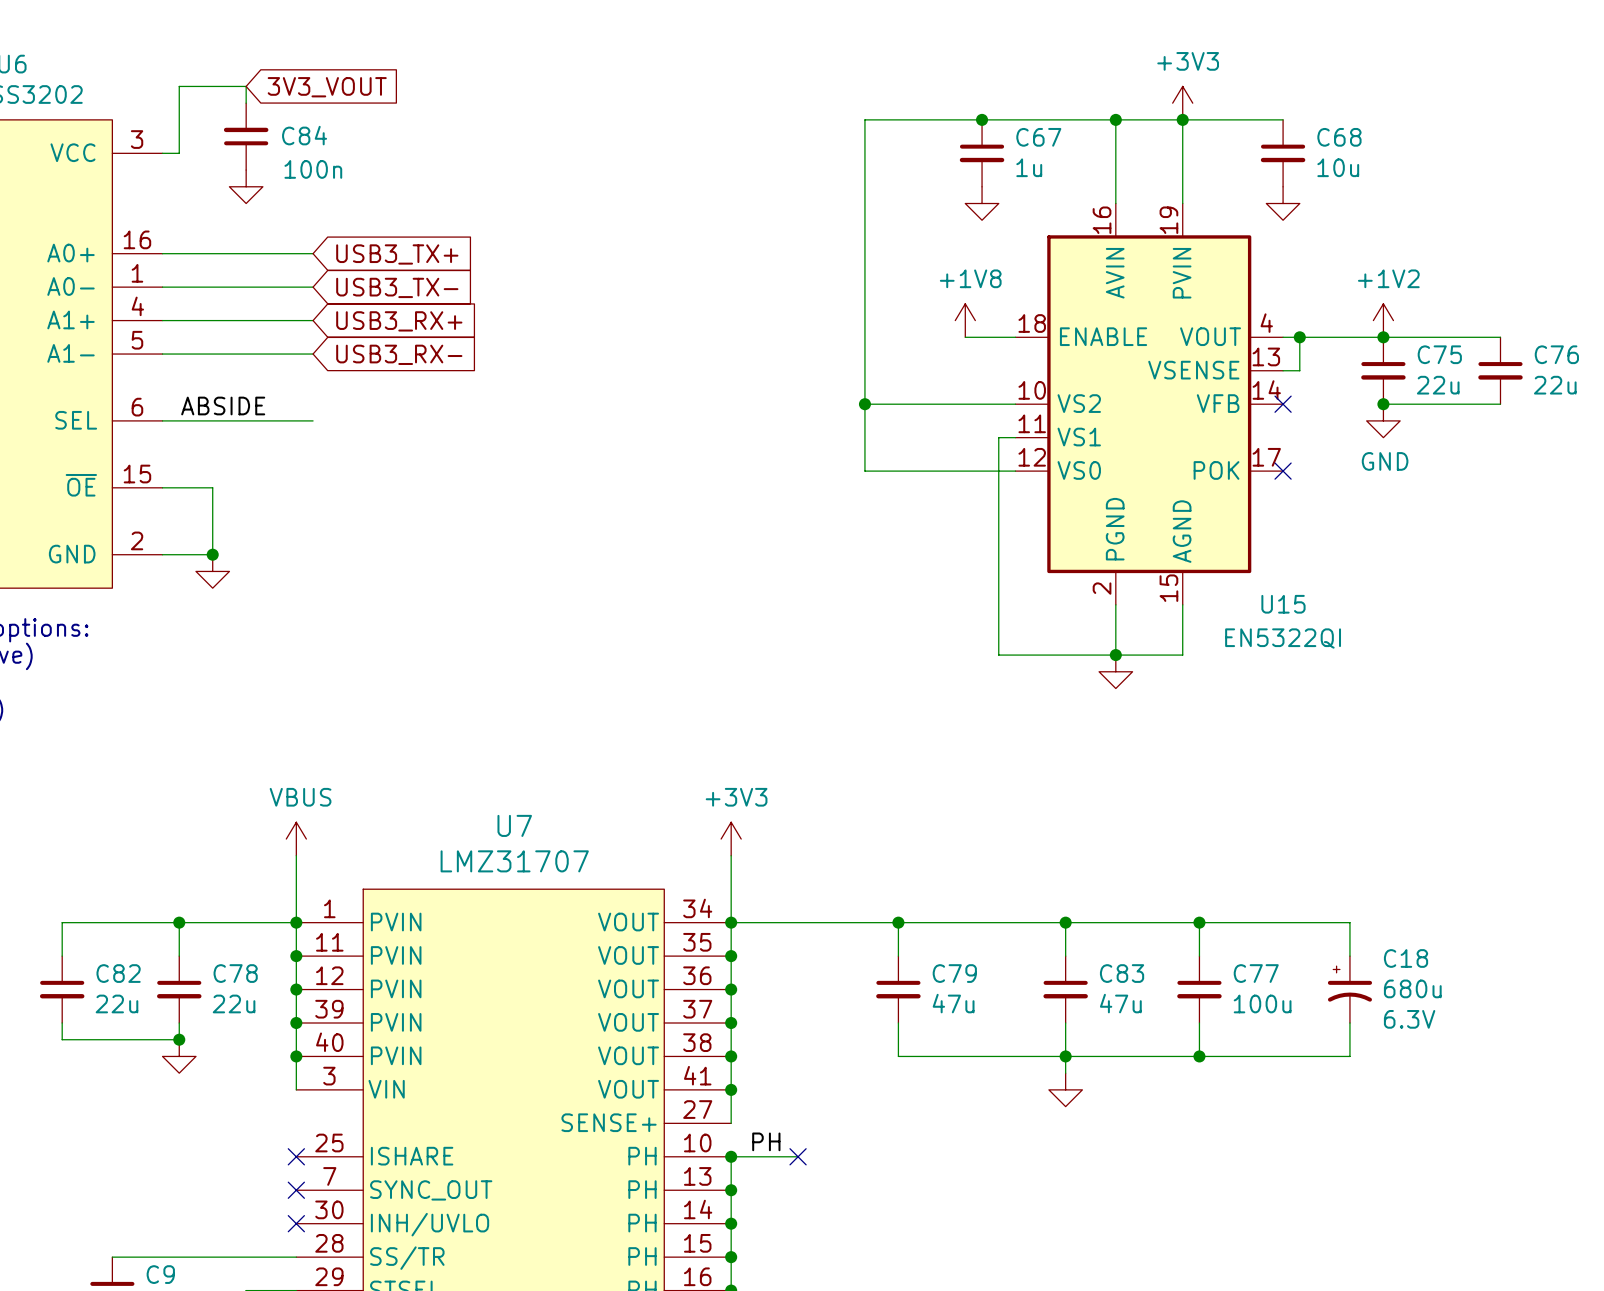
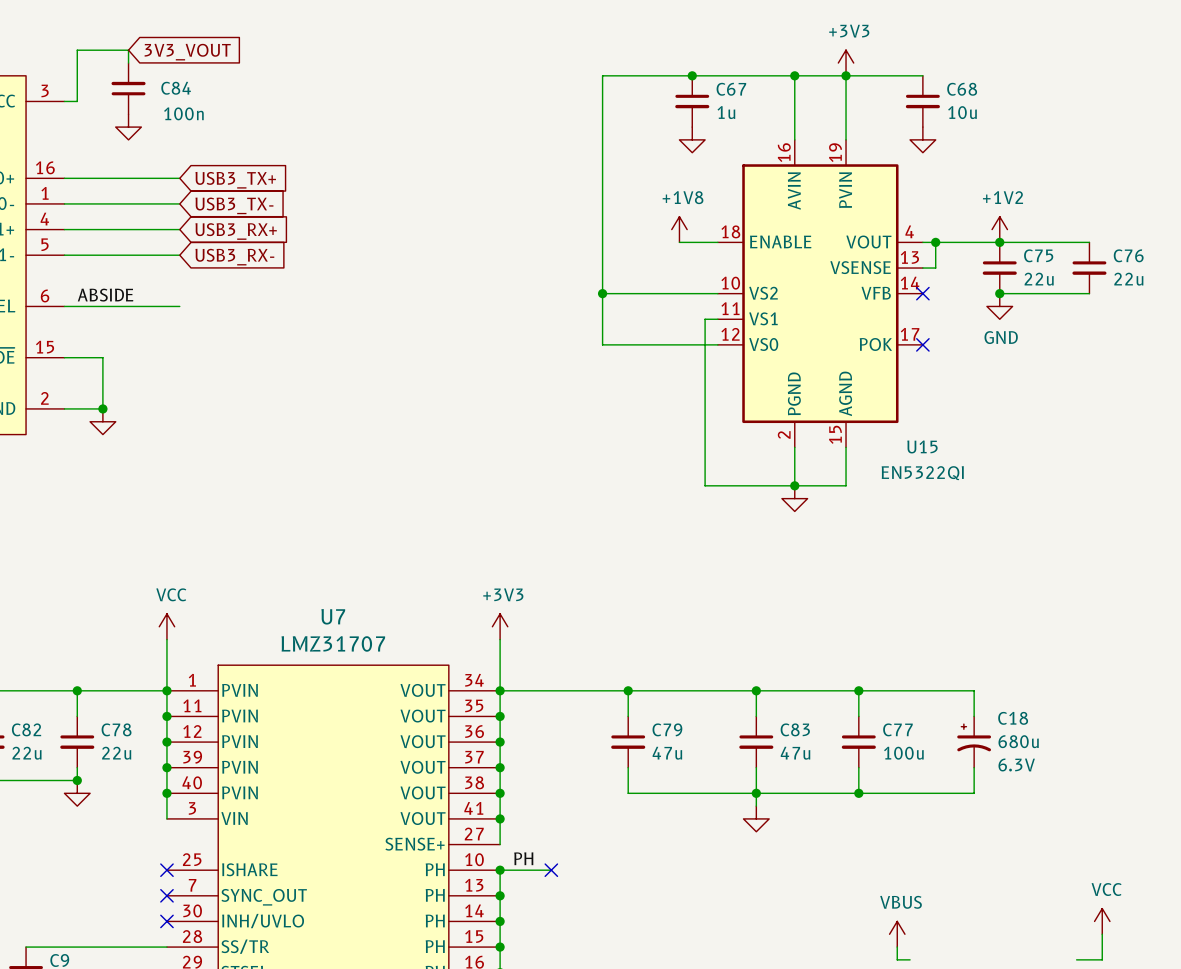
power symbol: VBUS (296, 839) -> VCC (166, 626)
power symbol: none -> VCC (1102, 921)
power symbol: none -> VBUS (897, 934)
wire: none -> (1102, 934) (1102, 959) (1076, 959)
wire: none -> (897, 947) (897, 959) (910, 959)

